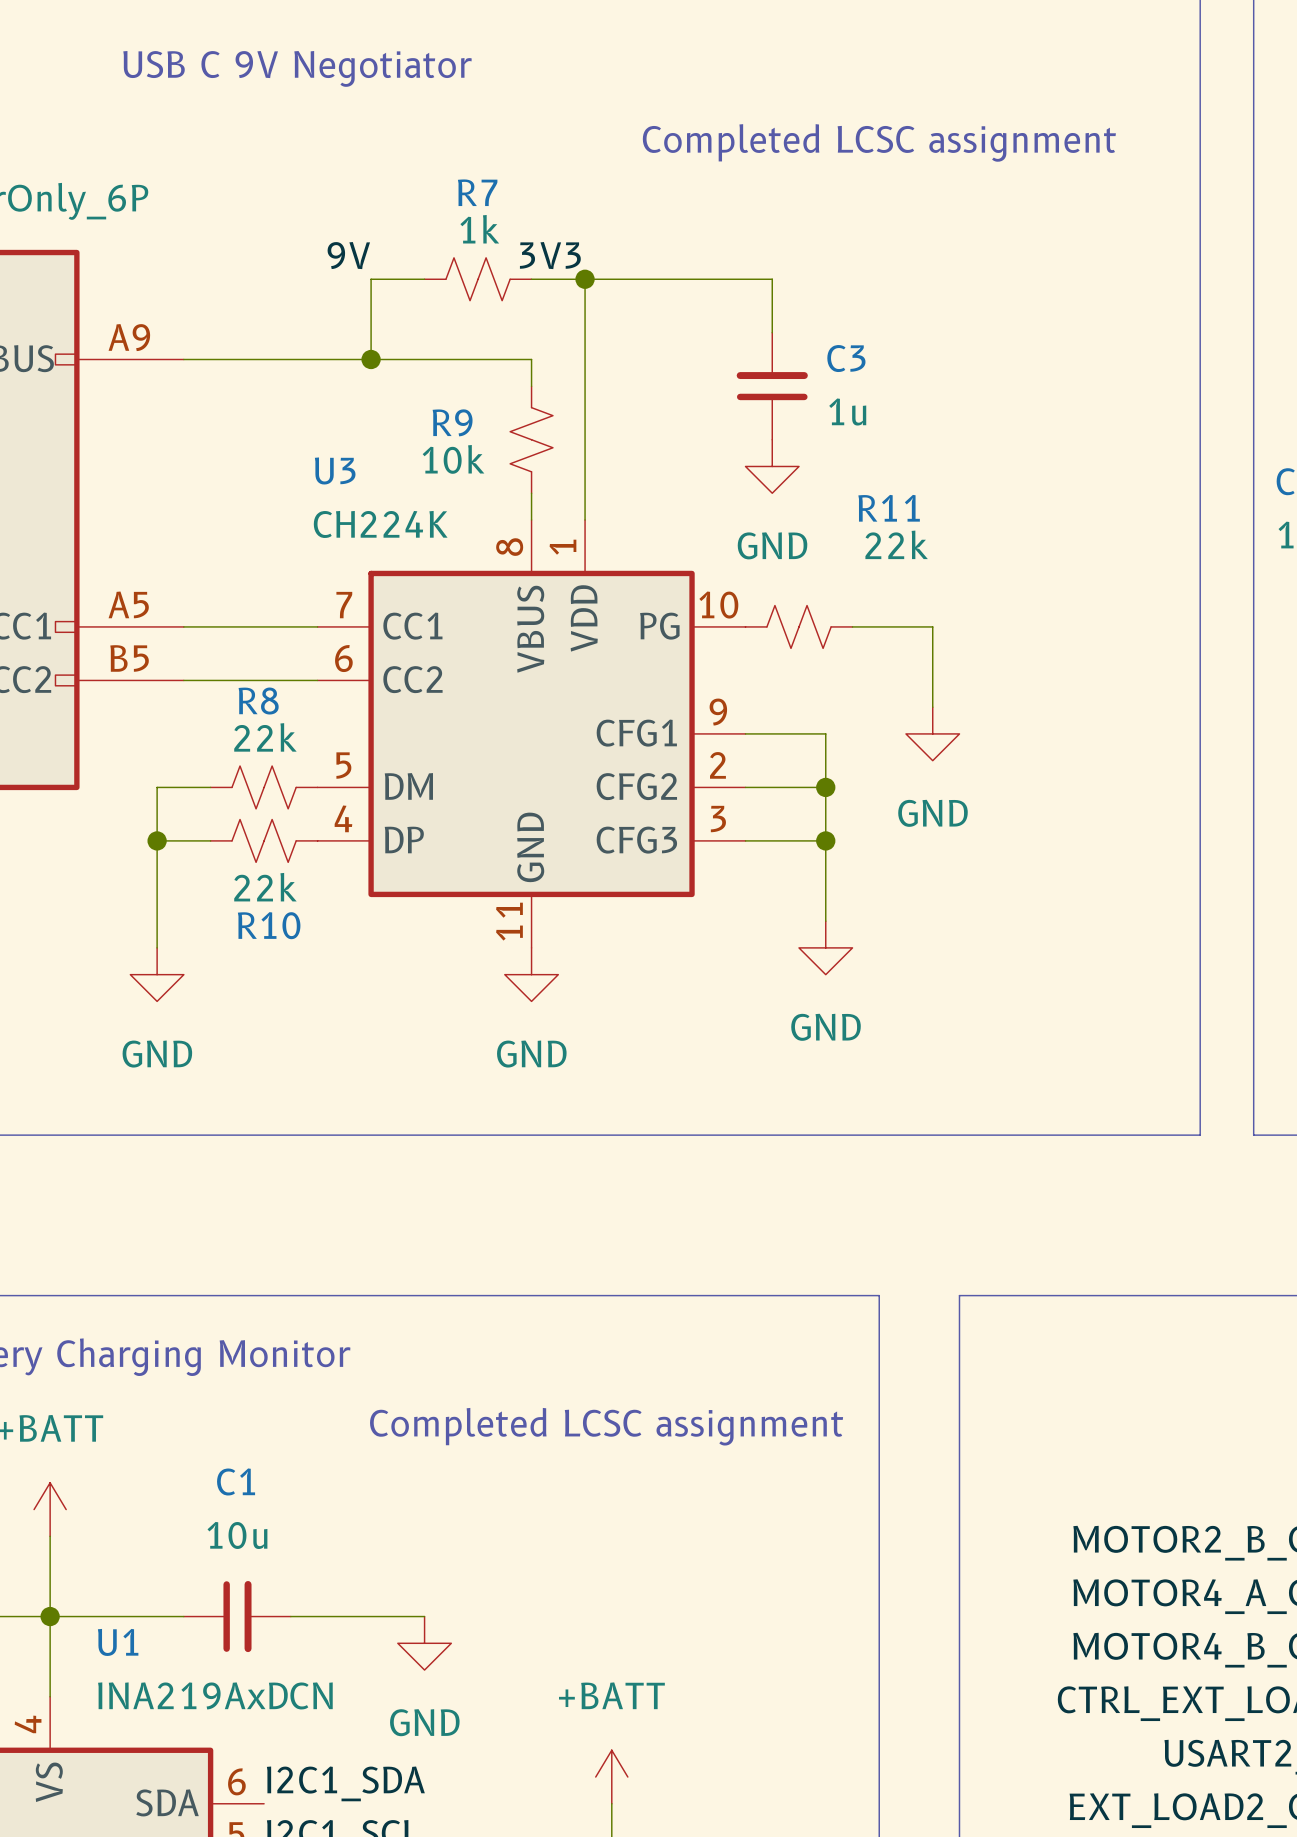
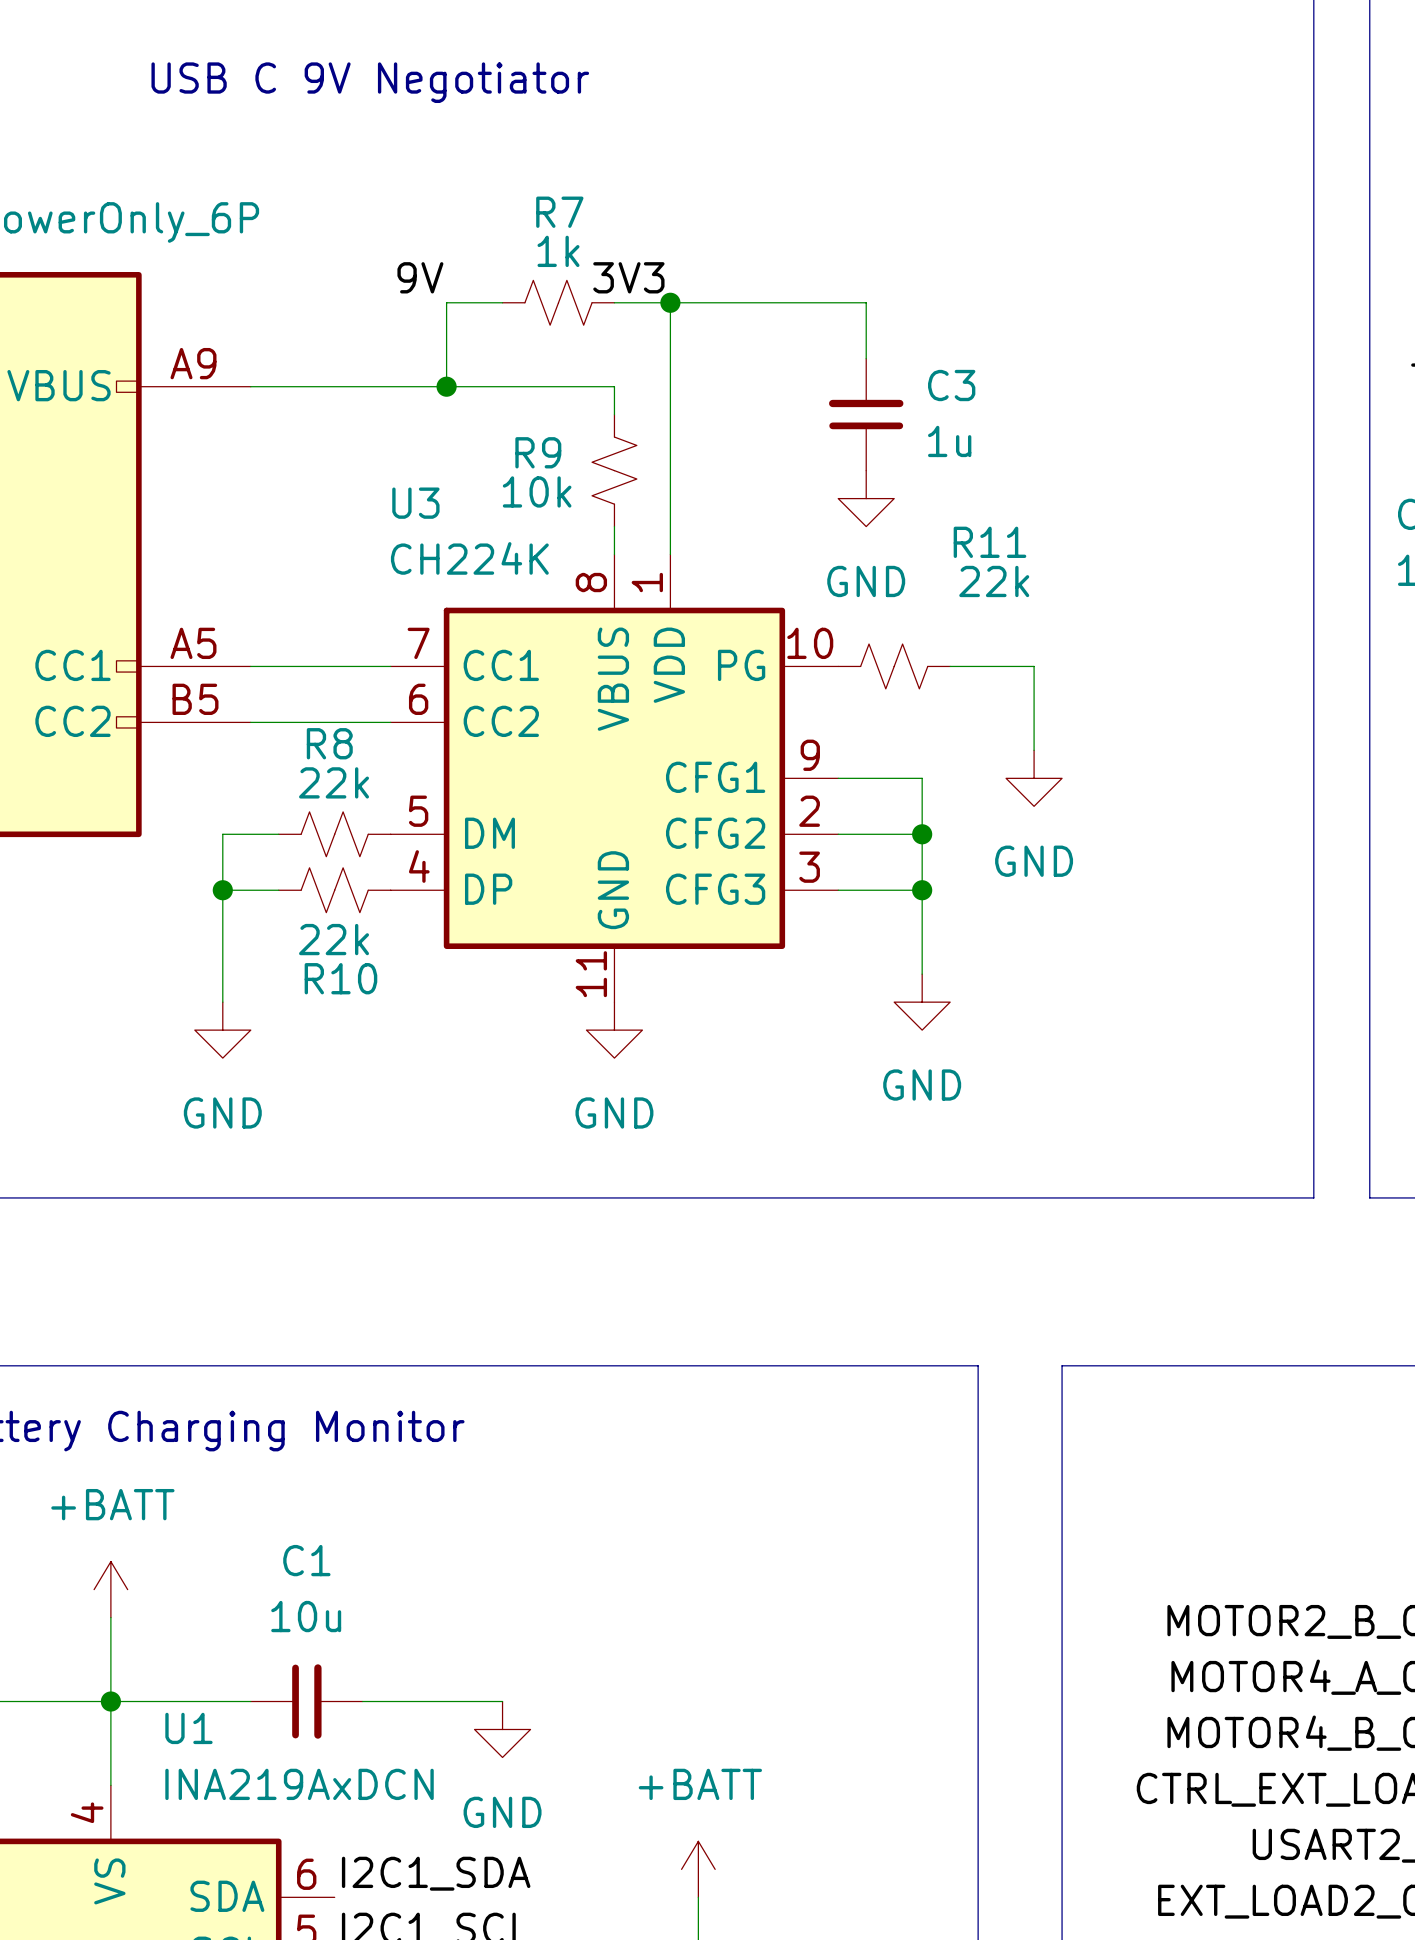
text: Completed LCSC assignment (879, 142) -> none
text: Completed LCSC assignment (606, 1426) -> none

